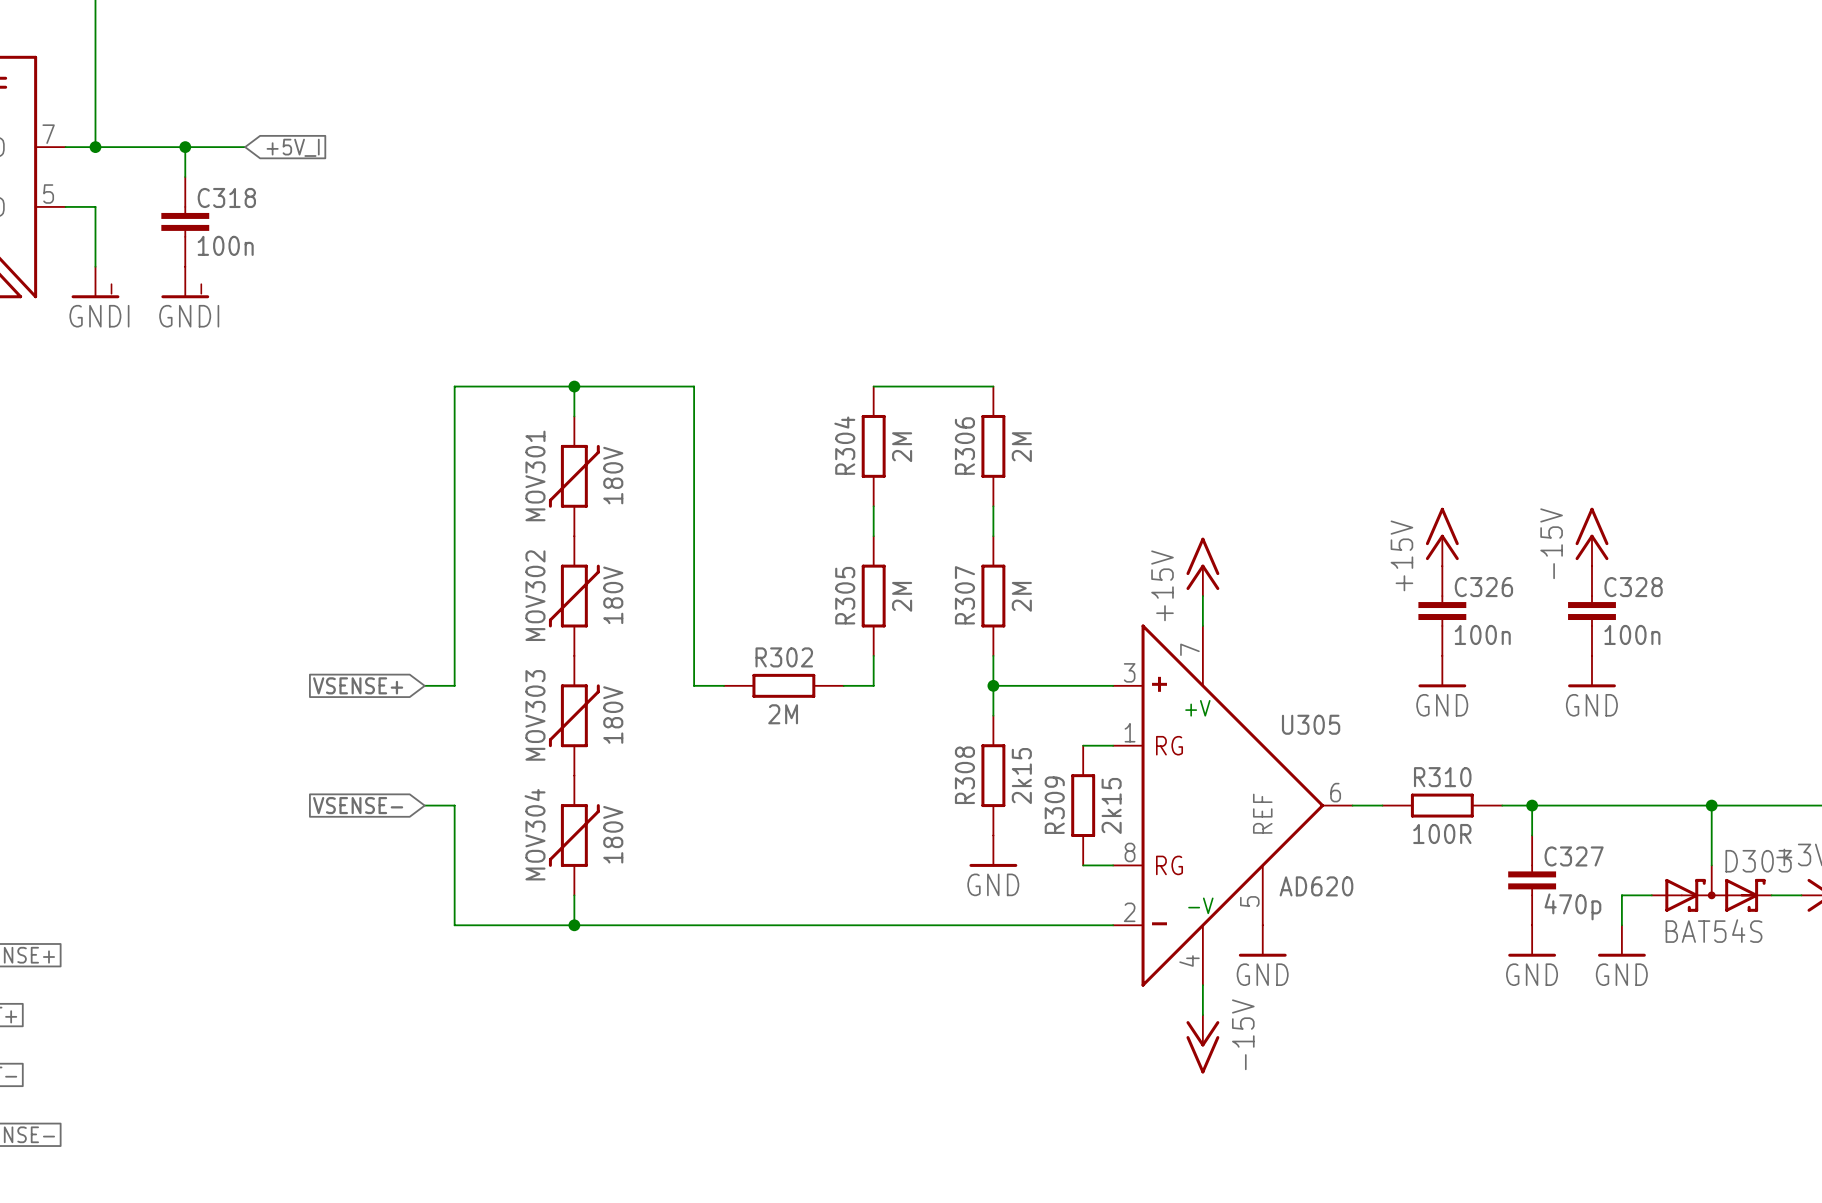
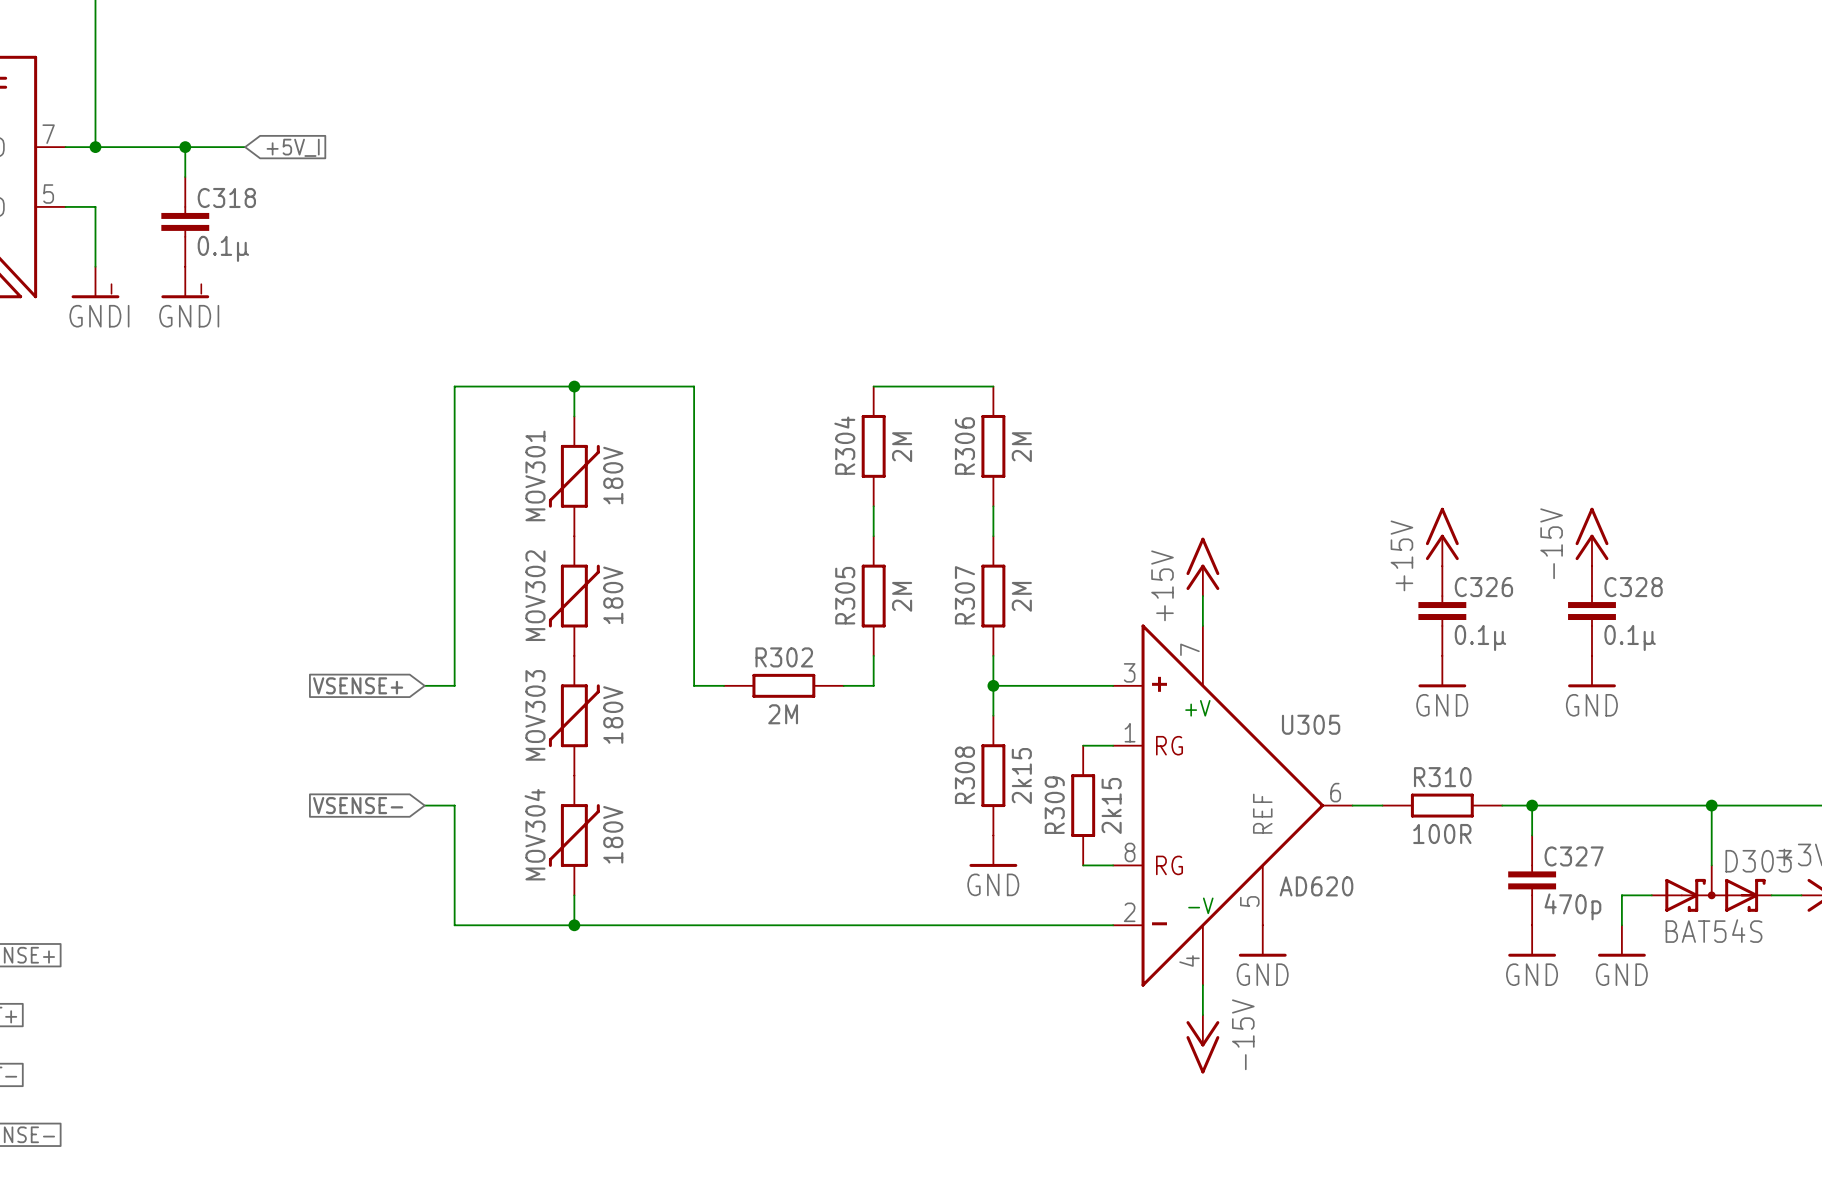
C318 value: 100n (225, 245) -> 0.1µ (223, 248)
C326 value: 100n (1482, 634) -> 0.1µ (1480, 637)
C328 value: 100n (1632, 634) -> 0.1µ (1630, 637)

